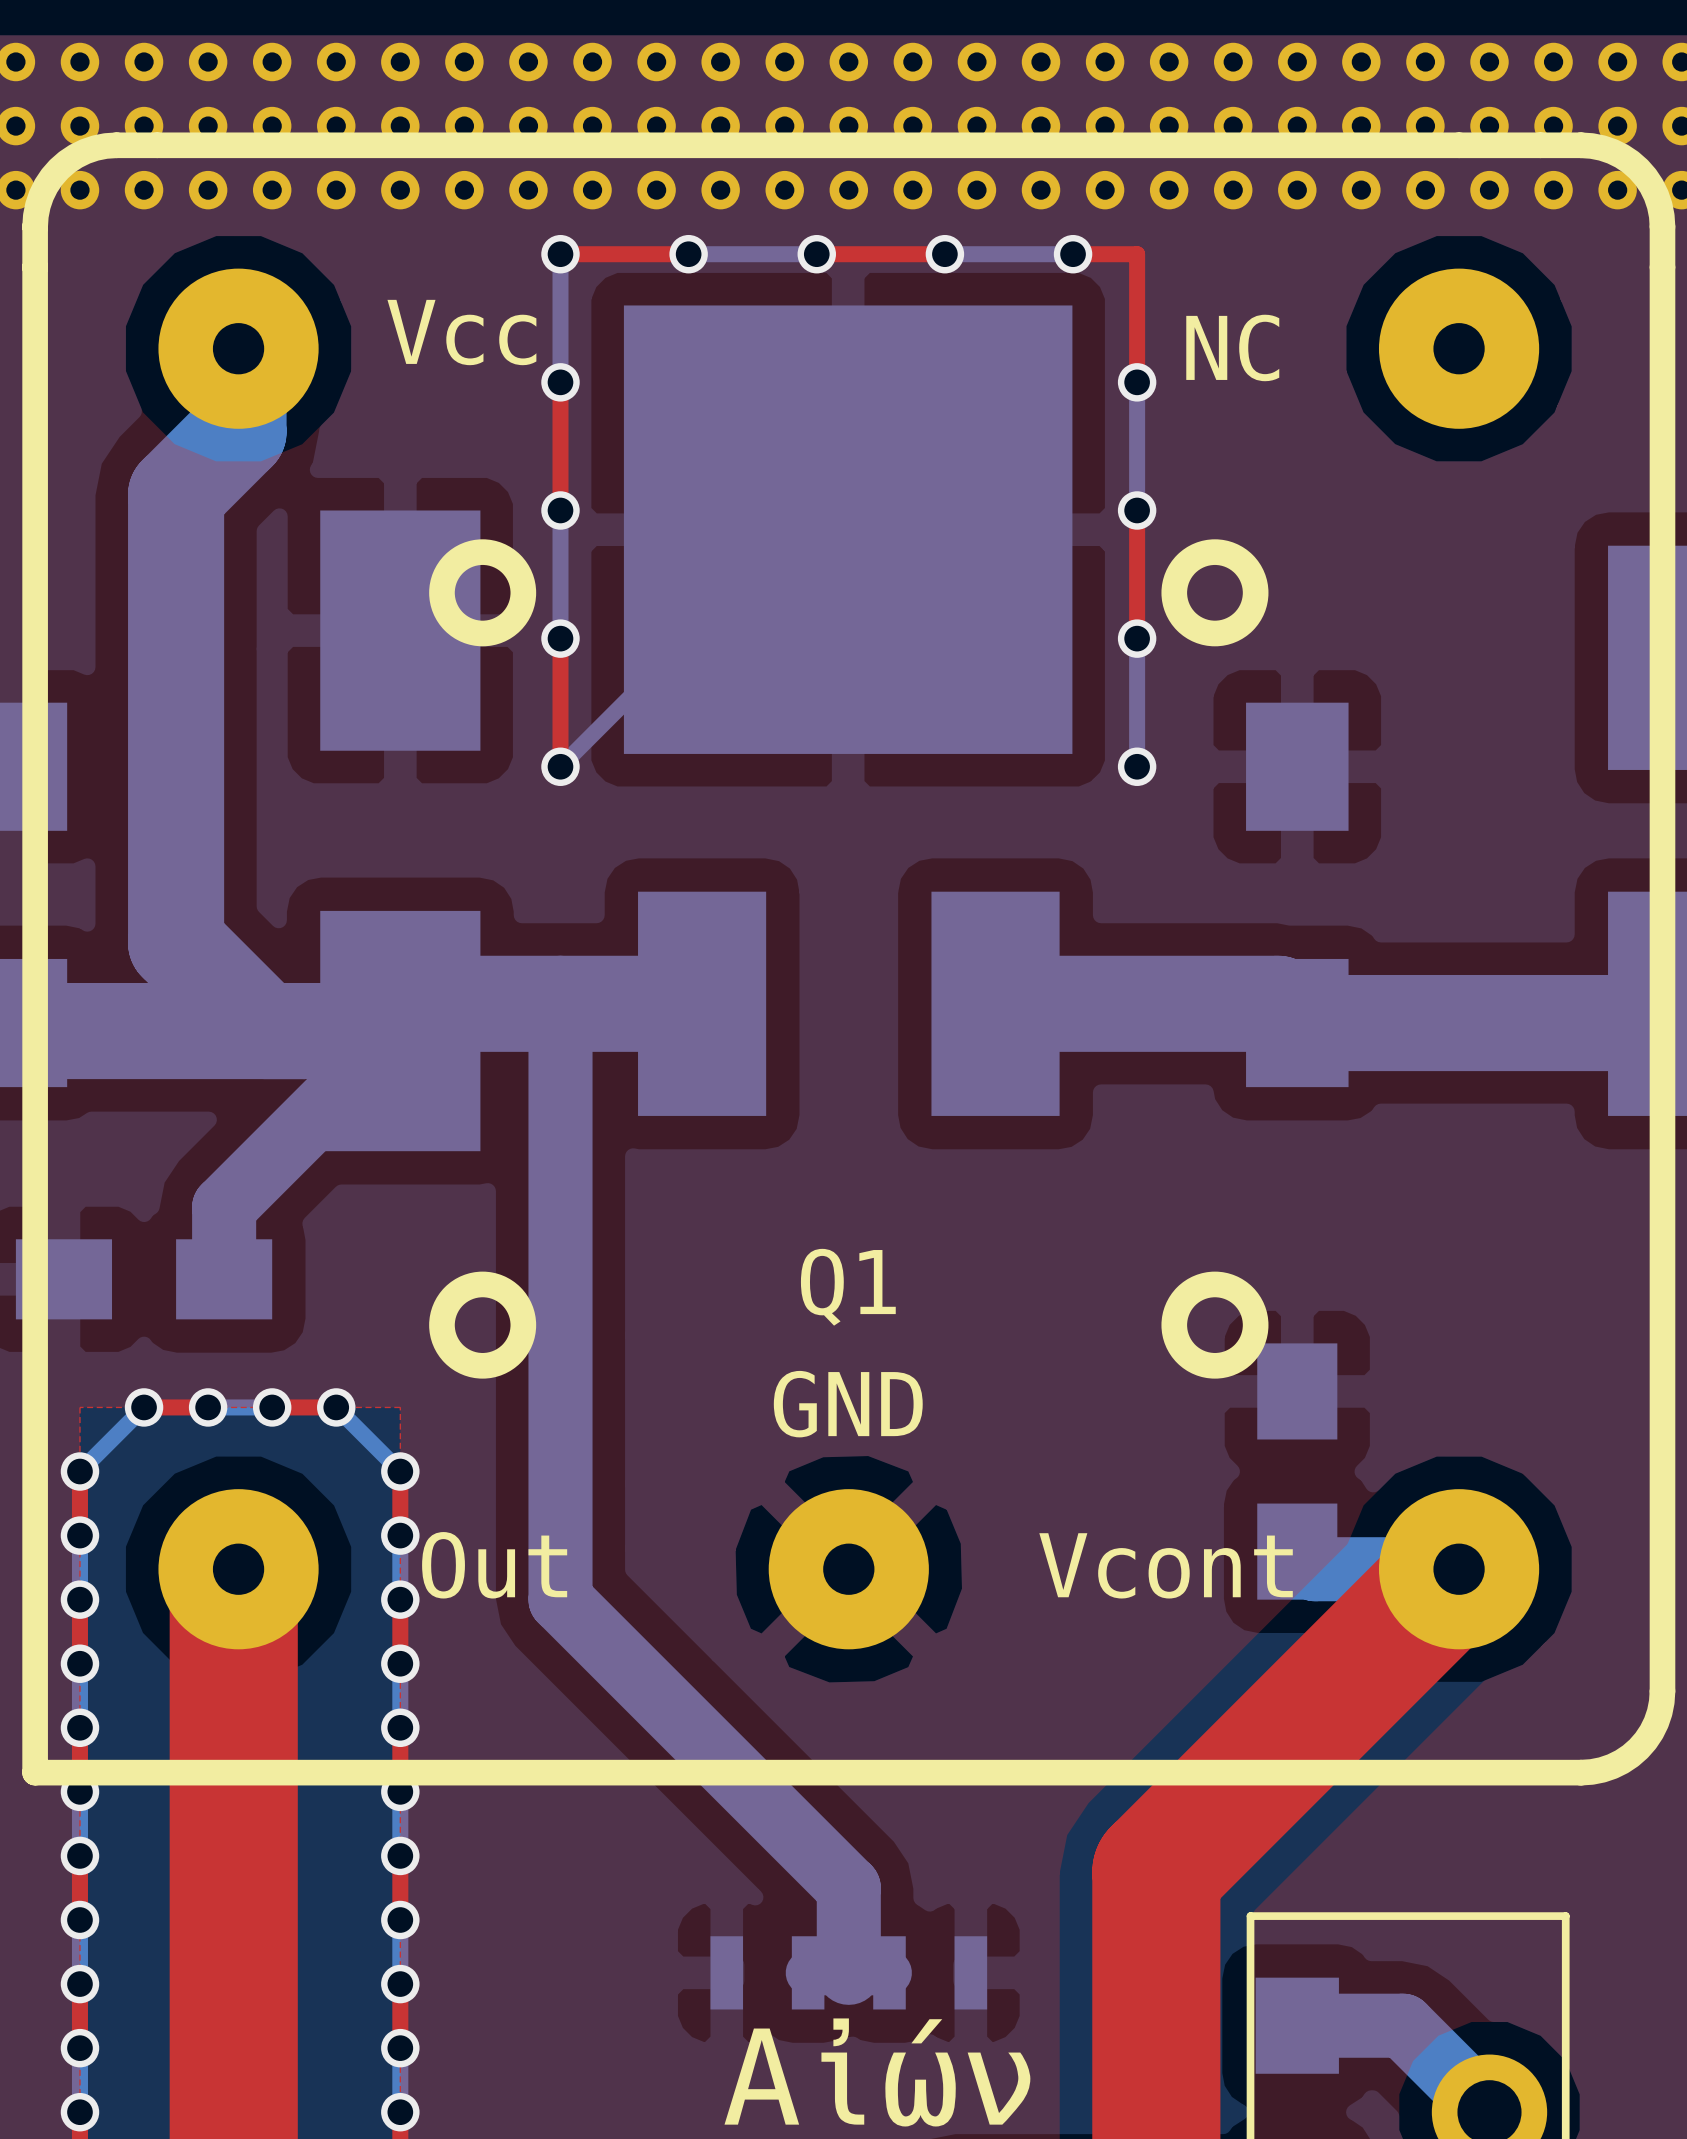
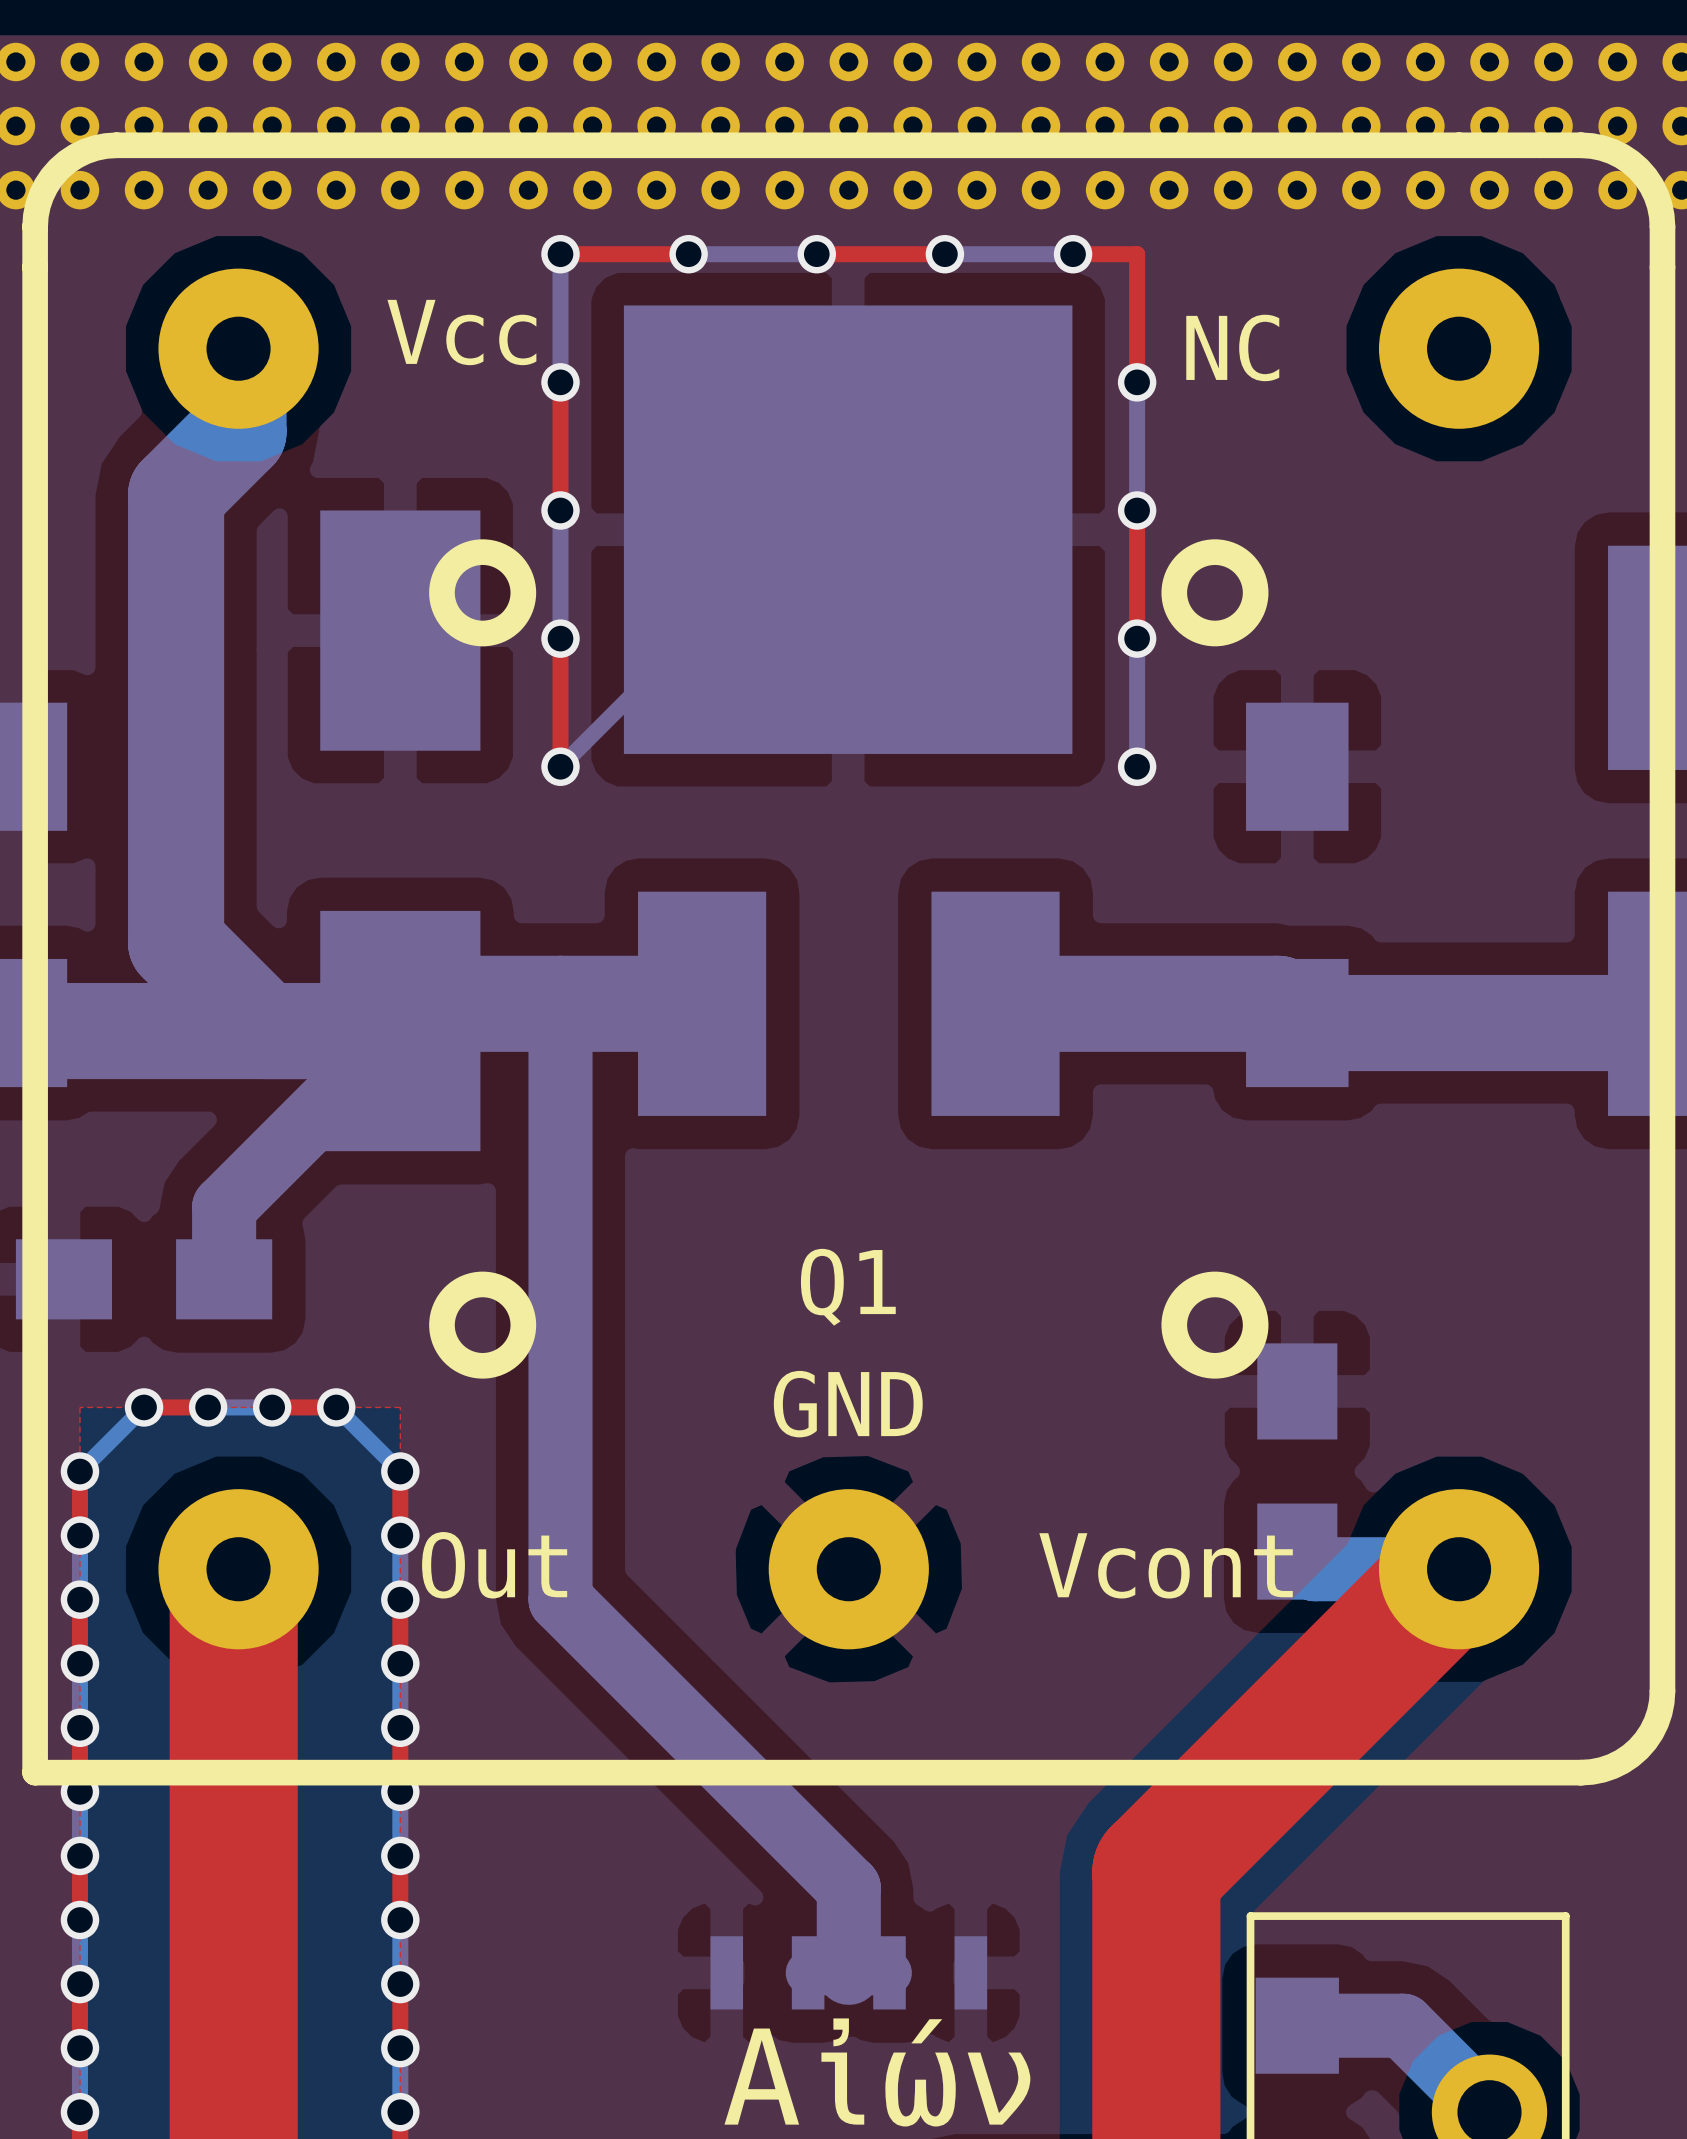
Q1 footprint: [22, 132, 1676, 1786] -> [22, 132, 1676, 1786]

